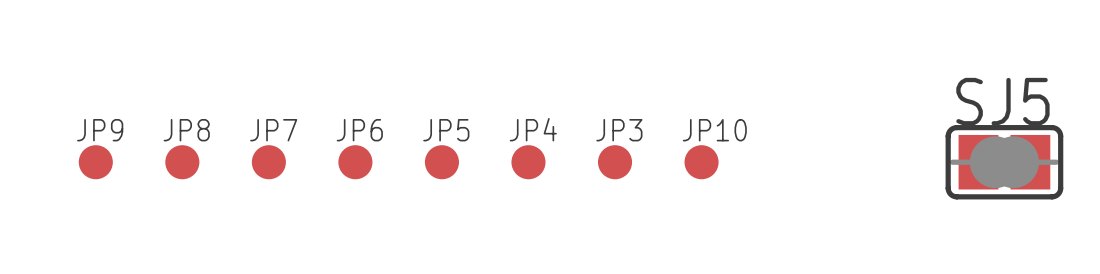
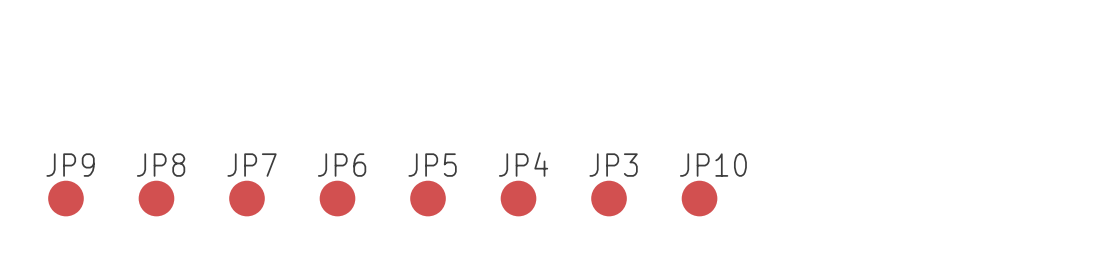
SJ5: (1004, 162) -> none

